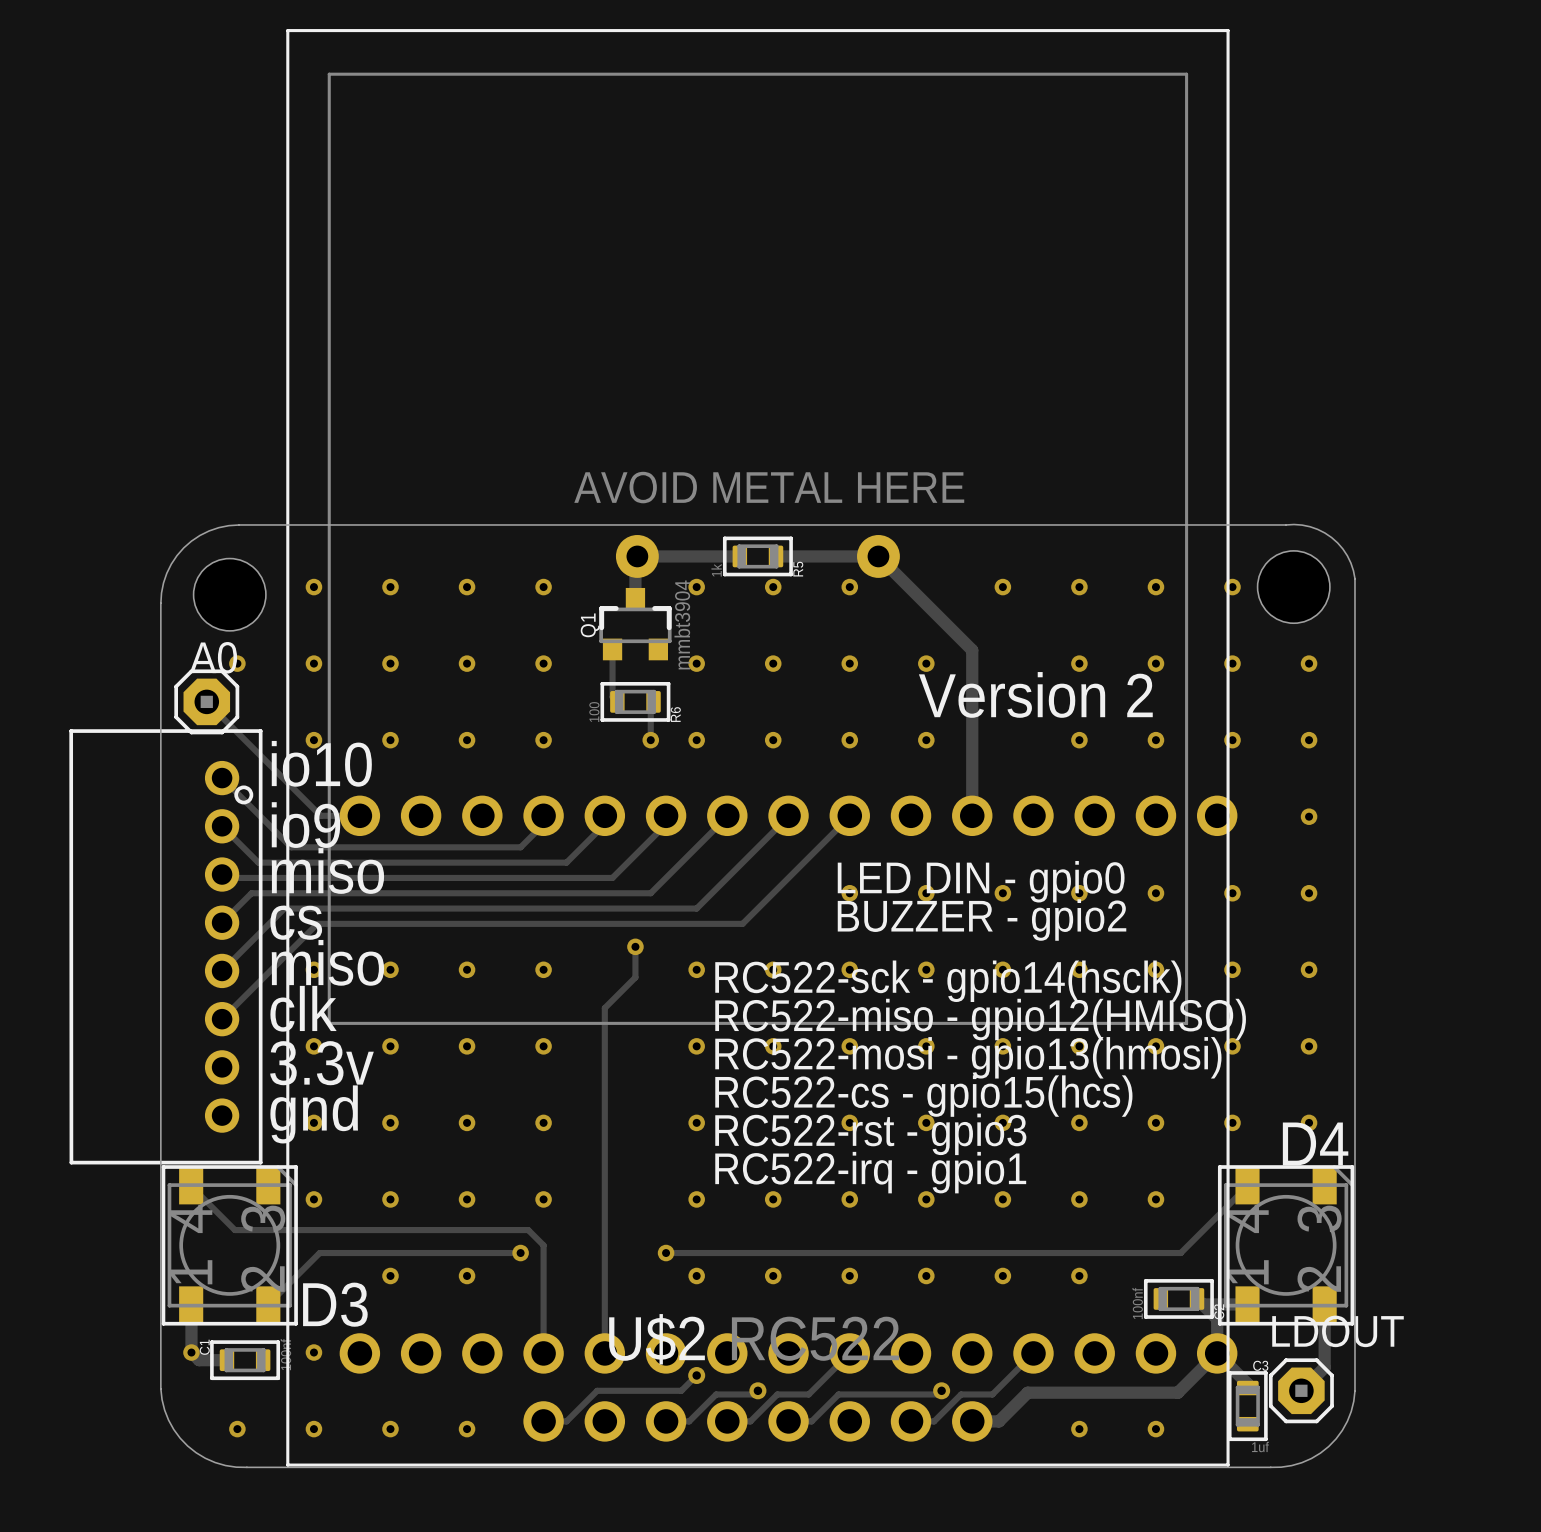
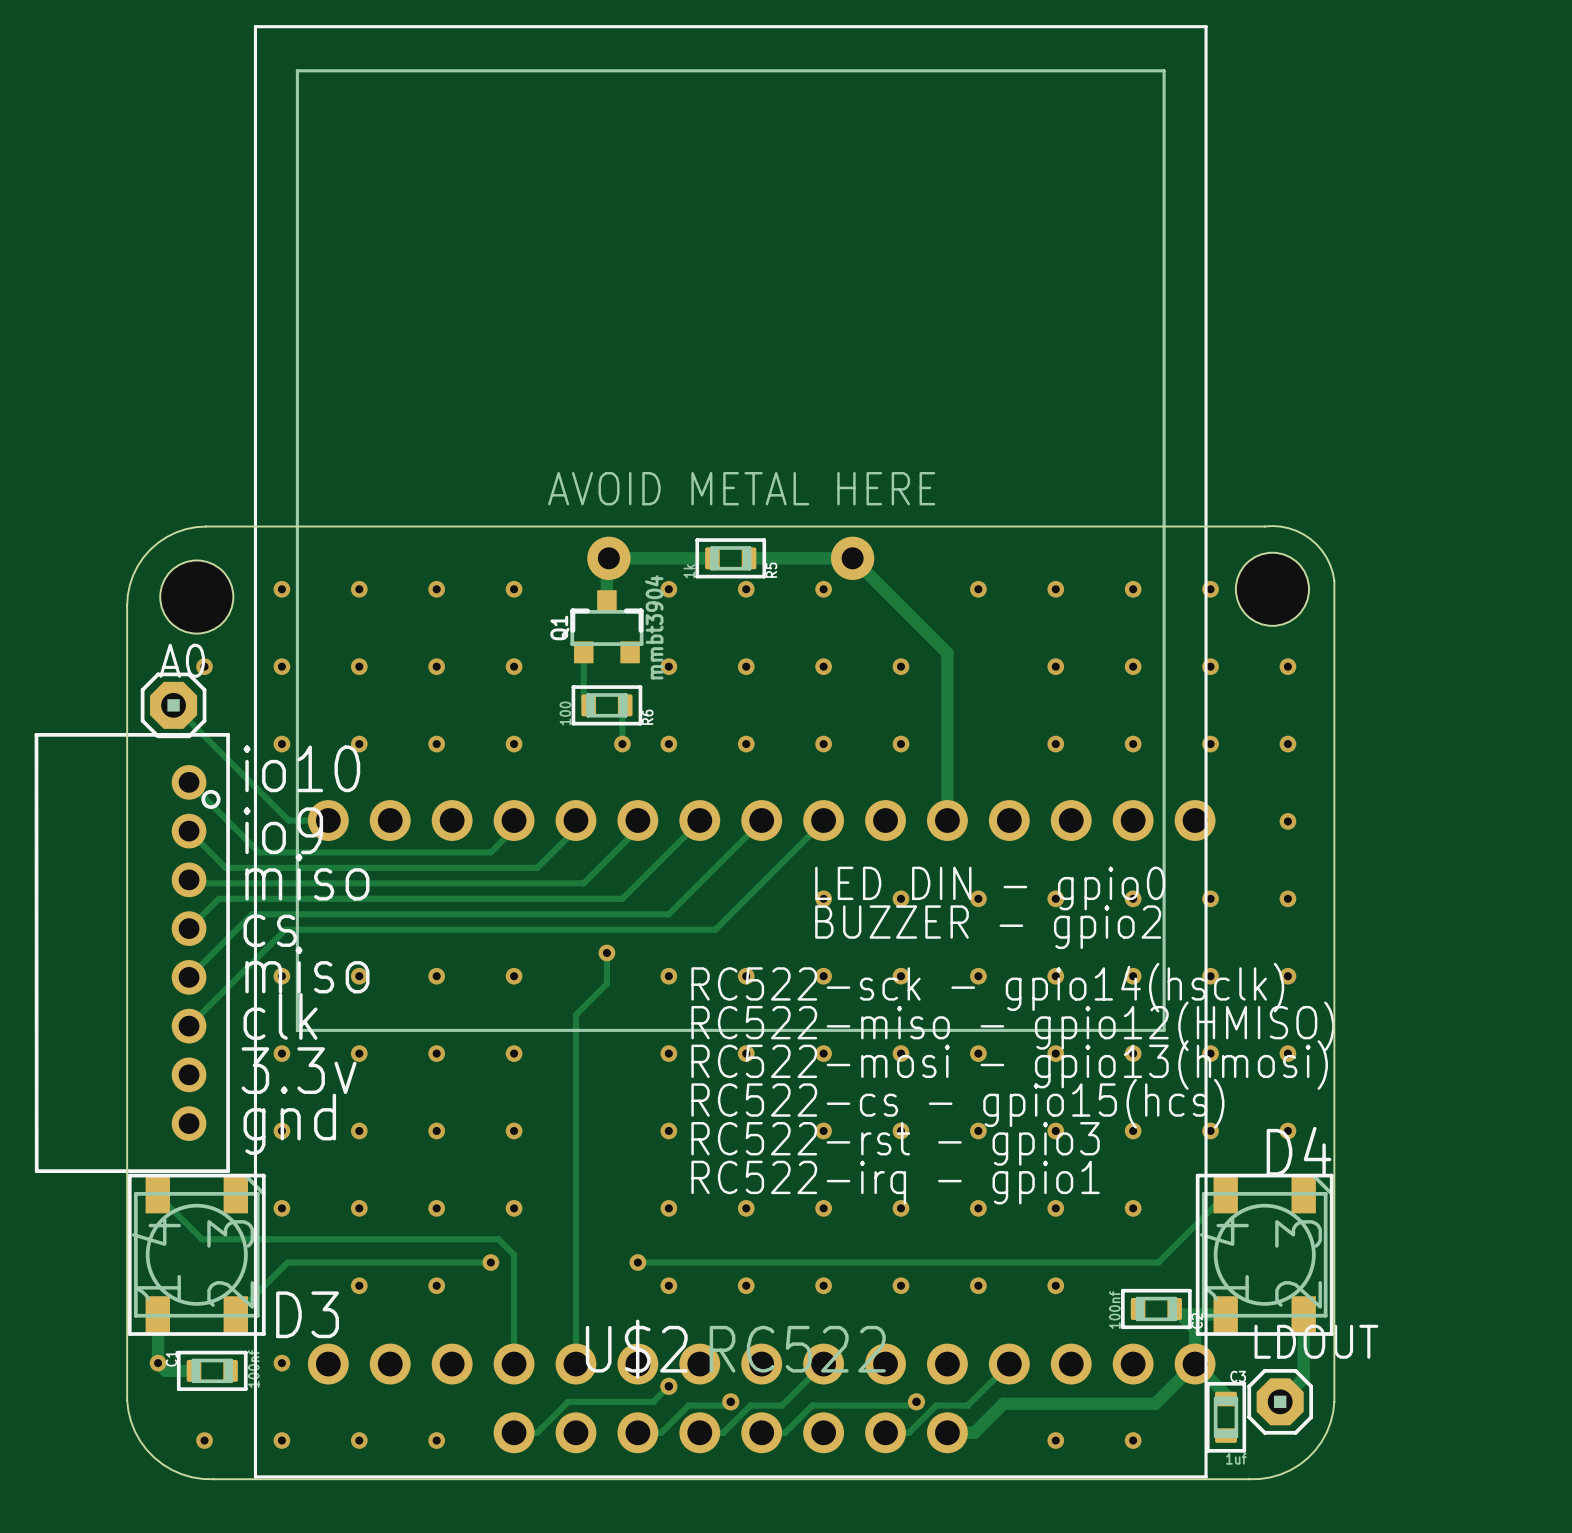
text: Version 2 (1035, 694) -> none

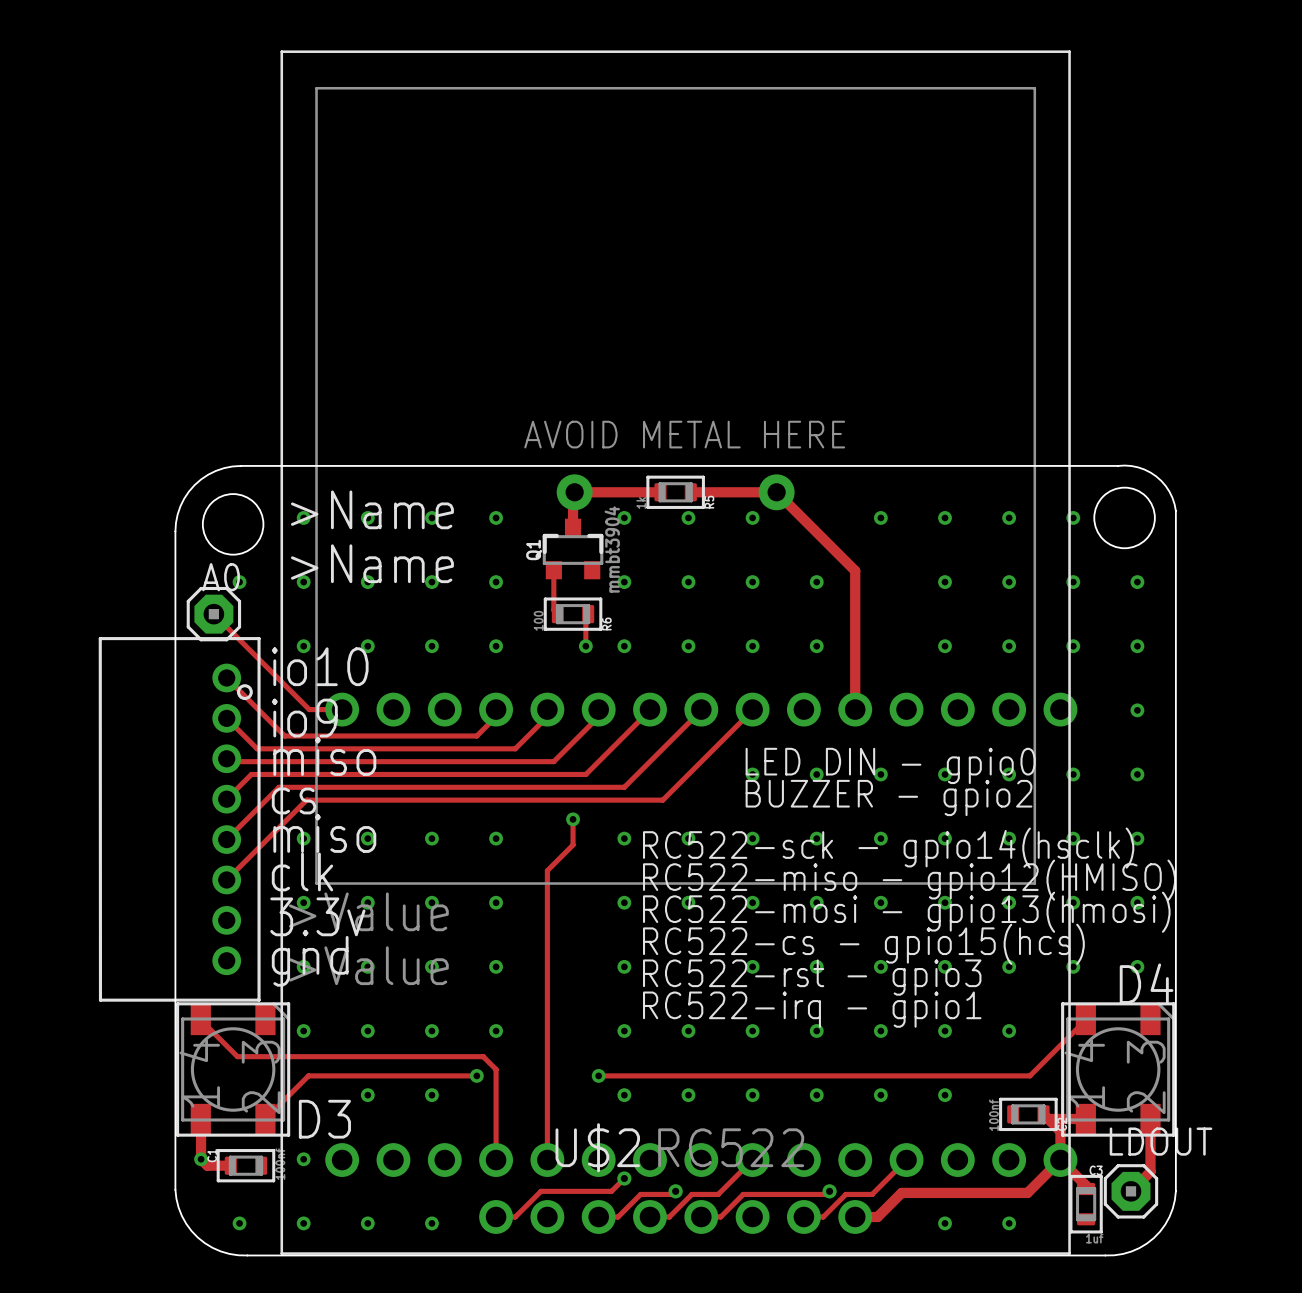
part text: none -> >Name (372, 509)
part text: none -> >Name (372, 563)
part text: none -> >Value (368, 911)
part text: none -> >Value (368, 965)

